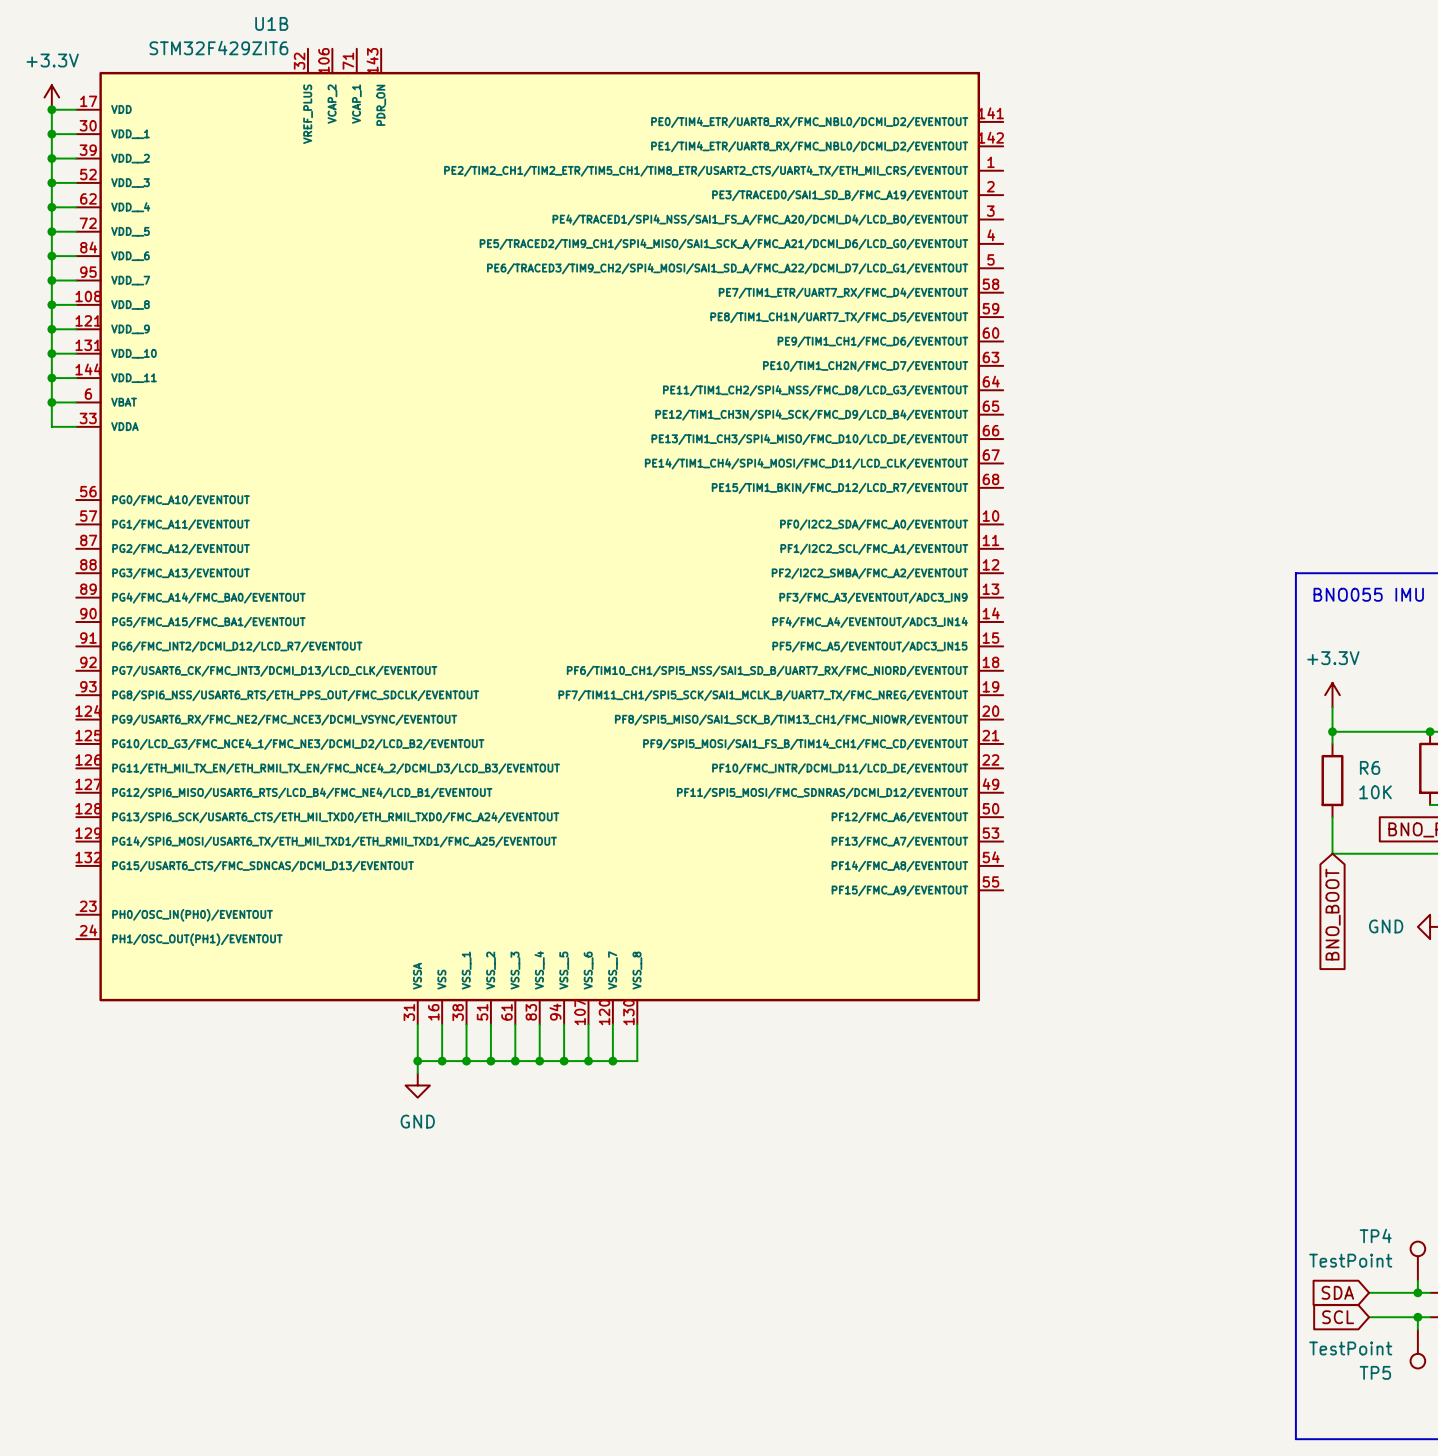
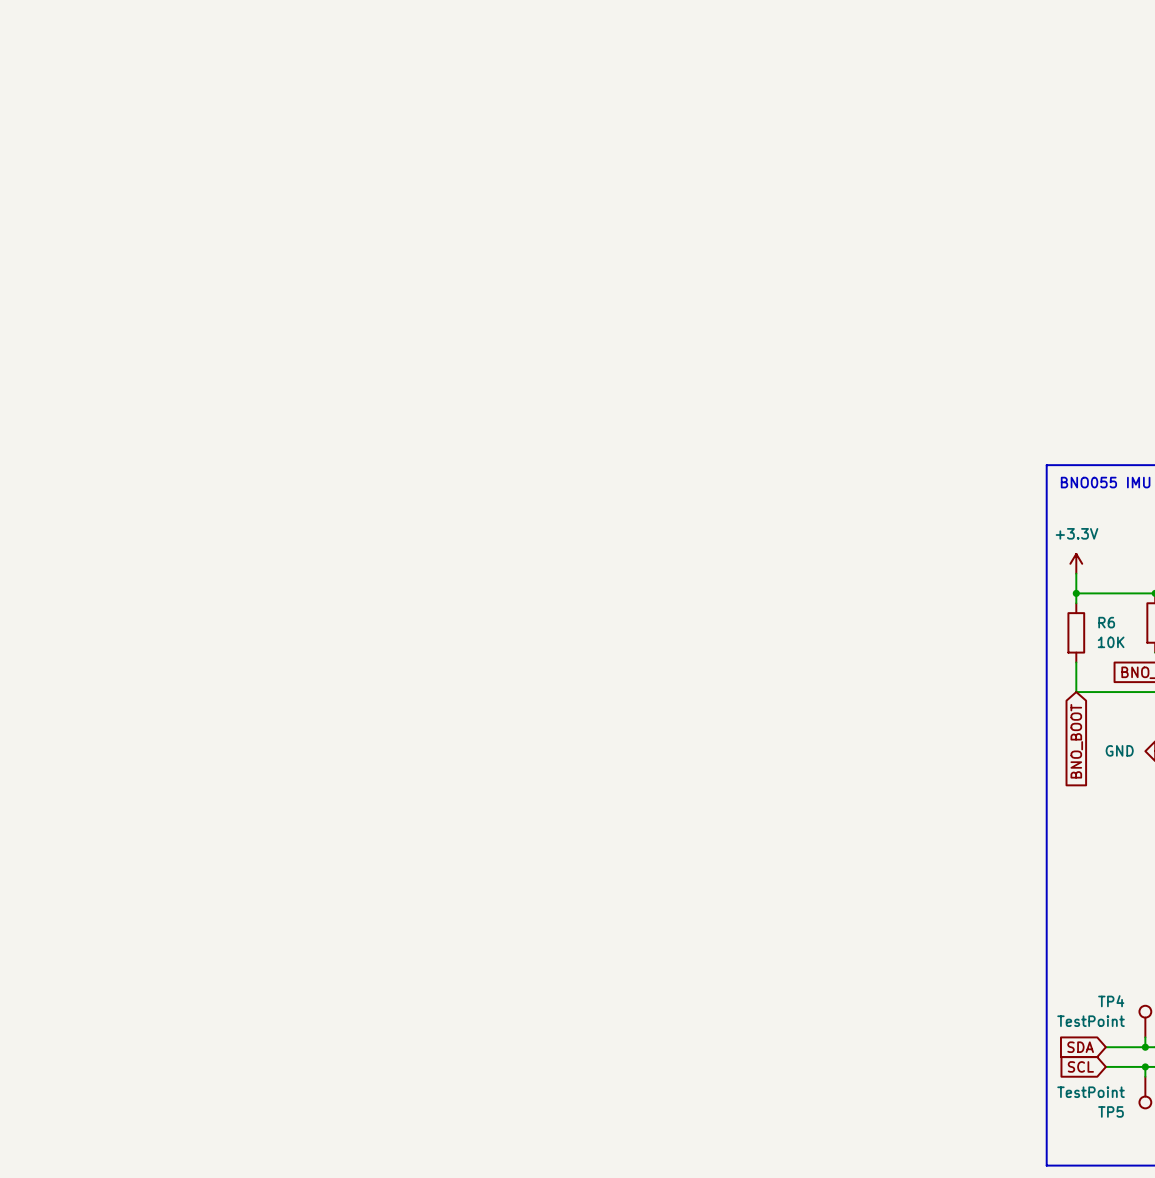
power symbol: +3.3V (51, 97) -> none
junction: (51, 109) -> none
wire: (76, 109) (51, 109) (51, 426) (76, 426) -> none
wire: (51, 134) (76, 134) -> none
junction: (51, 134) -> none
wire: (51, 158) (76, 158) -> none
junction: (51, 158) -> none
wire: (51, 182) (76, 182) -> none
junction: (51, 182) -> none
wire: (51, 207) (76, 207) -> none
junction: (51, 207) -> none
wire: (51, 231) (76, 231) -> none
junction: (51, 231) -> none
wire: (51, 256) (76, 256) -> none
junction: (51, 256) -> none
wire: (51, 280) (76, 280) -> none
junction: (51, 280) -> none
wire: (51, 304) (76, 304) -> none
junction: (51, 304) -> none
wire: (51, 329) (76, 329) -> none
junction: (51, 329) -> none
wire: (51, 353) (76, 353) -> none
junction: (51, 353) -> none
wire: (51, 378) (76, 378) -> none
junction: (51, 378) -> none
wire: (51, 402) (76, 402) -> none
junction: (51, 402) -> none
U1B: STM32F429ZIT6 (539, 536) -> none
wire: (417, 1024) (417, 1073) -> none
wire: (442, 1024) (442, 1061) -> none
wire: (466, 1024) (466, 1061) -> none
wire: (490, 1024) (490, 1061) -> none
wire: (515, 1024) (515, 1061) -> none
wire: (539, 1024) (539, 1061) -> none
wire: (564, 1024) (564, 1061) -> none
wire: (588, 1024) (588, 1061) -> none
wire: (612, 1024) (612, 1061) -> none
wire: (637, 1024) (637, 1061) (417, 1061) -> none
junction: (417, 1061) -> none
junction: (442, 1061) -> none
junction: (466, 1061) -> none
junction: (490, 1061) -> none
junction: (515, 1061) -> none
junction: (539, 1061) -> none
junction: (564, 1061) -> none
junction: (588, 1061) -> none
junction: (612, 1061) -> none
power symbol: GND (417, 1085) -> none

